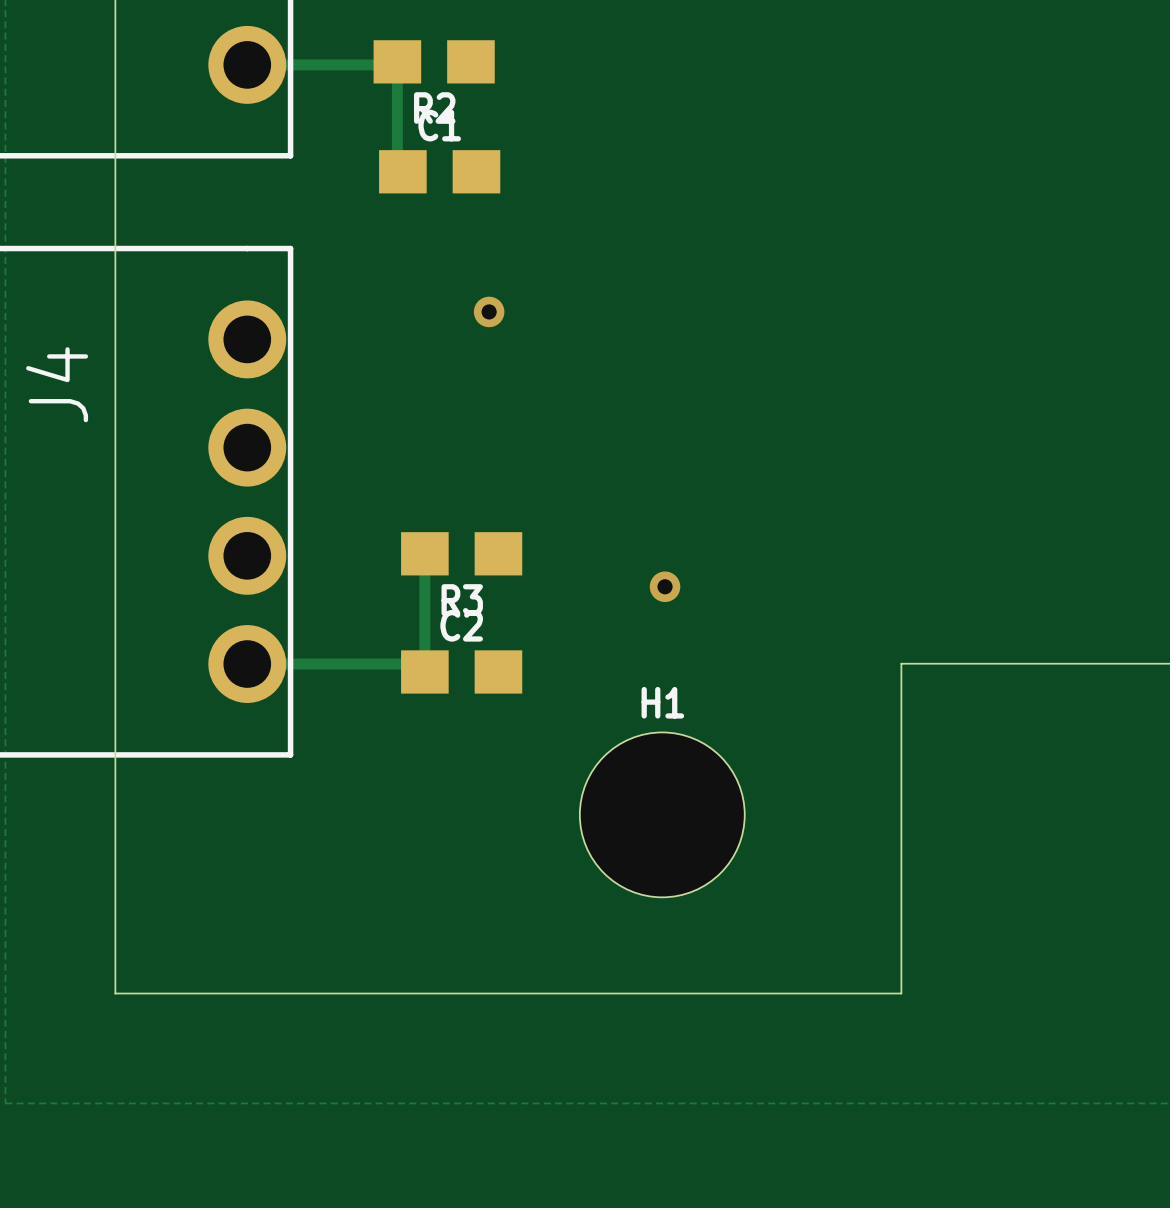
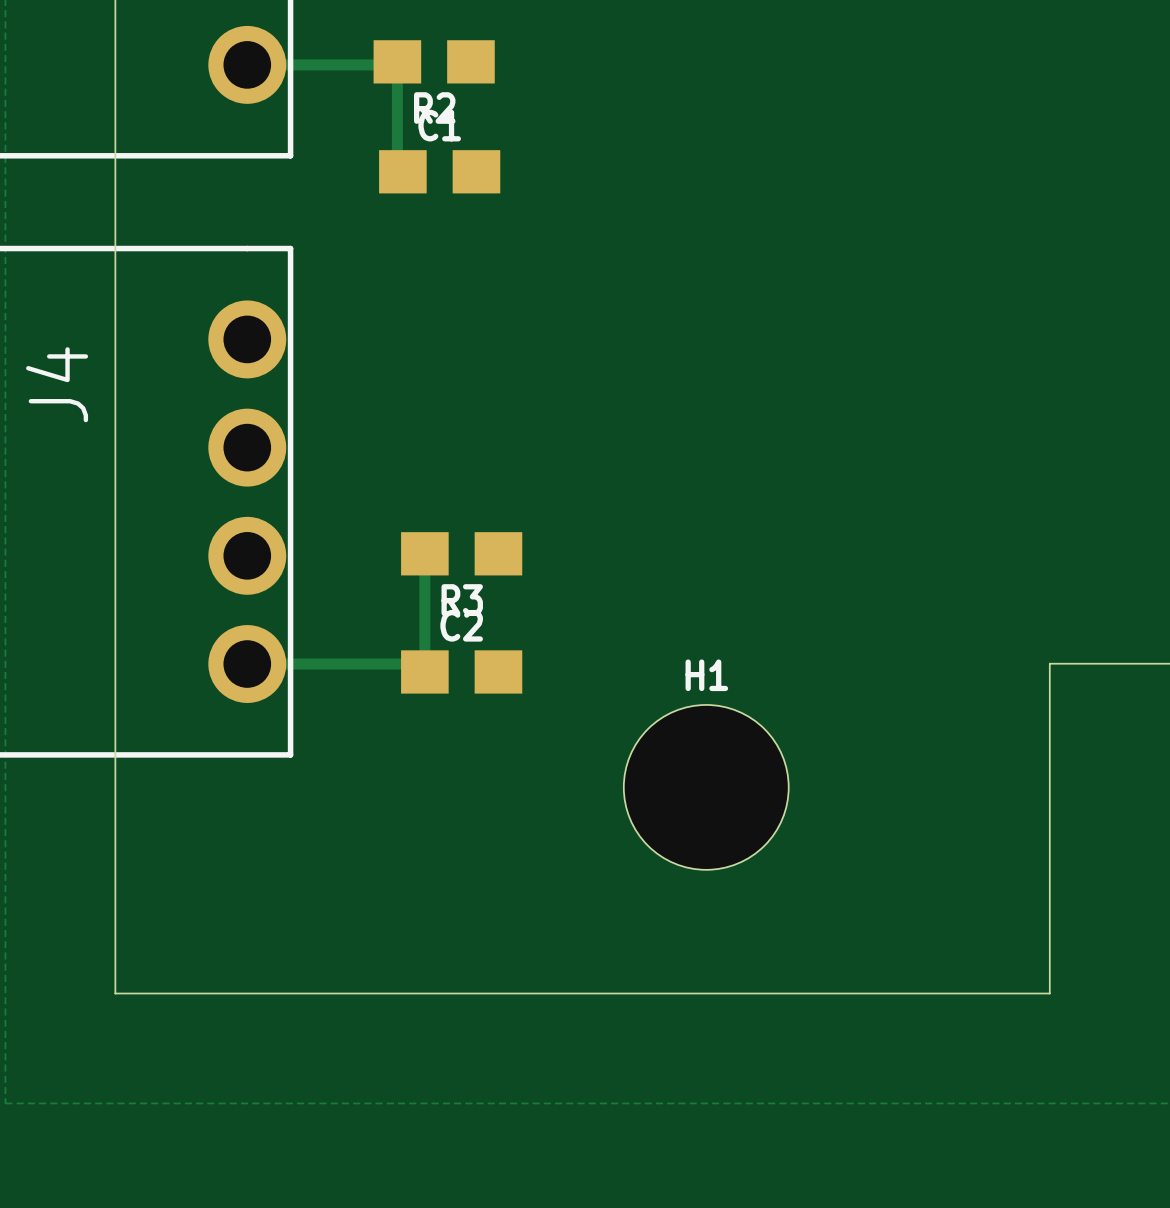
via: (489, 311) -> none
via: (665, 586) -> none
board edge: (1049, 663) (901, 663) (901, 993) -> (1049, 663) (1049, 993) (901, 993)
H1 position: (662, 814) -> (706, 787)

